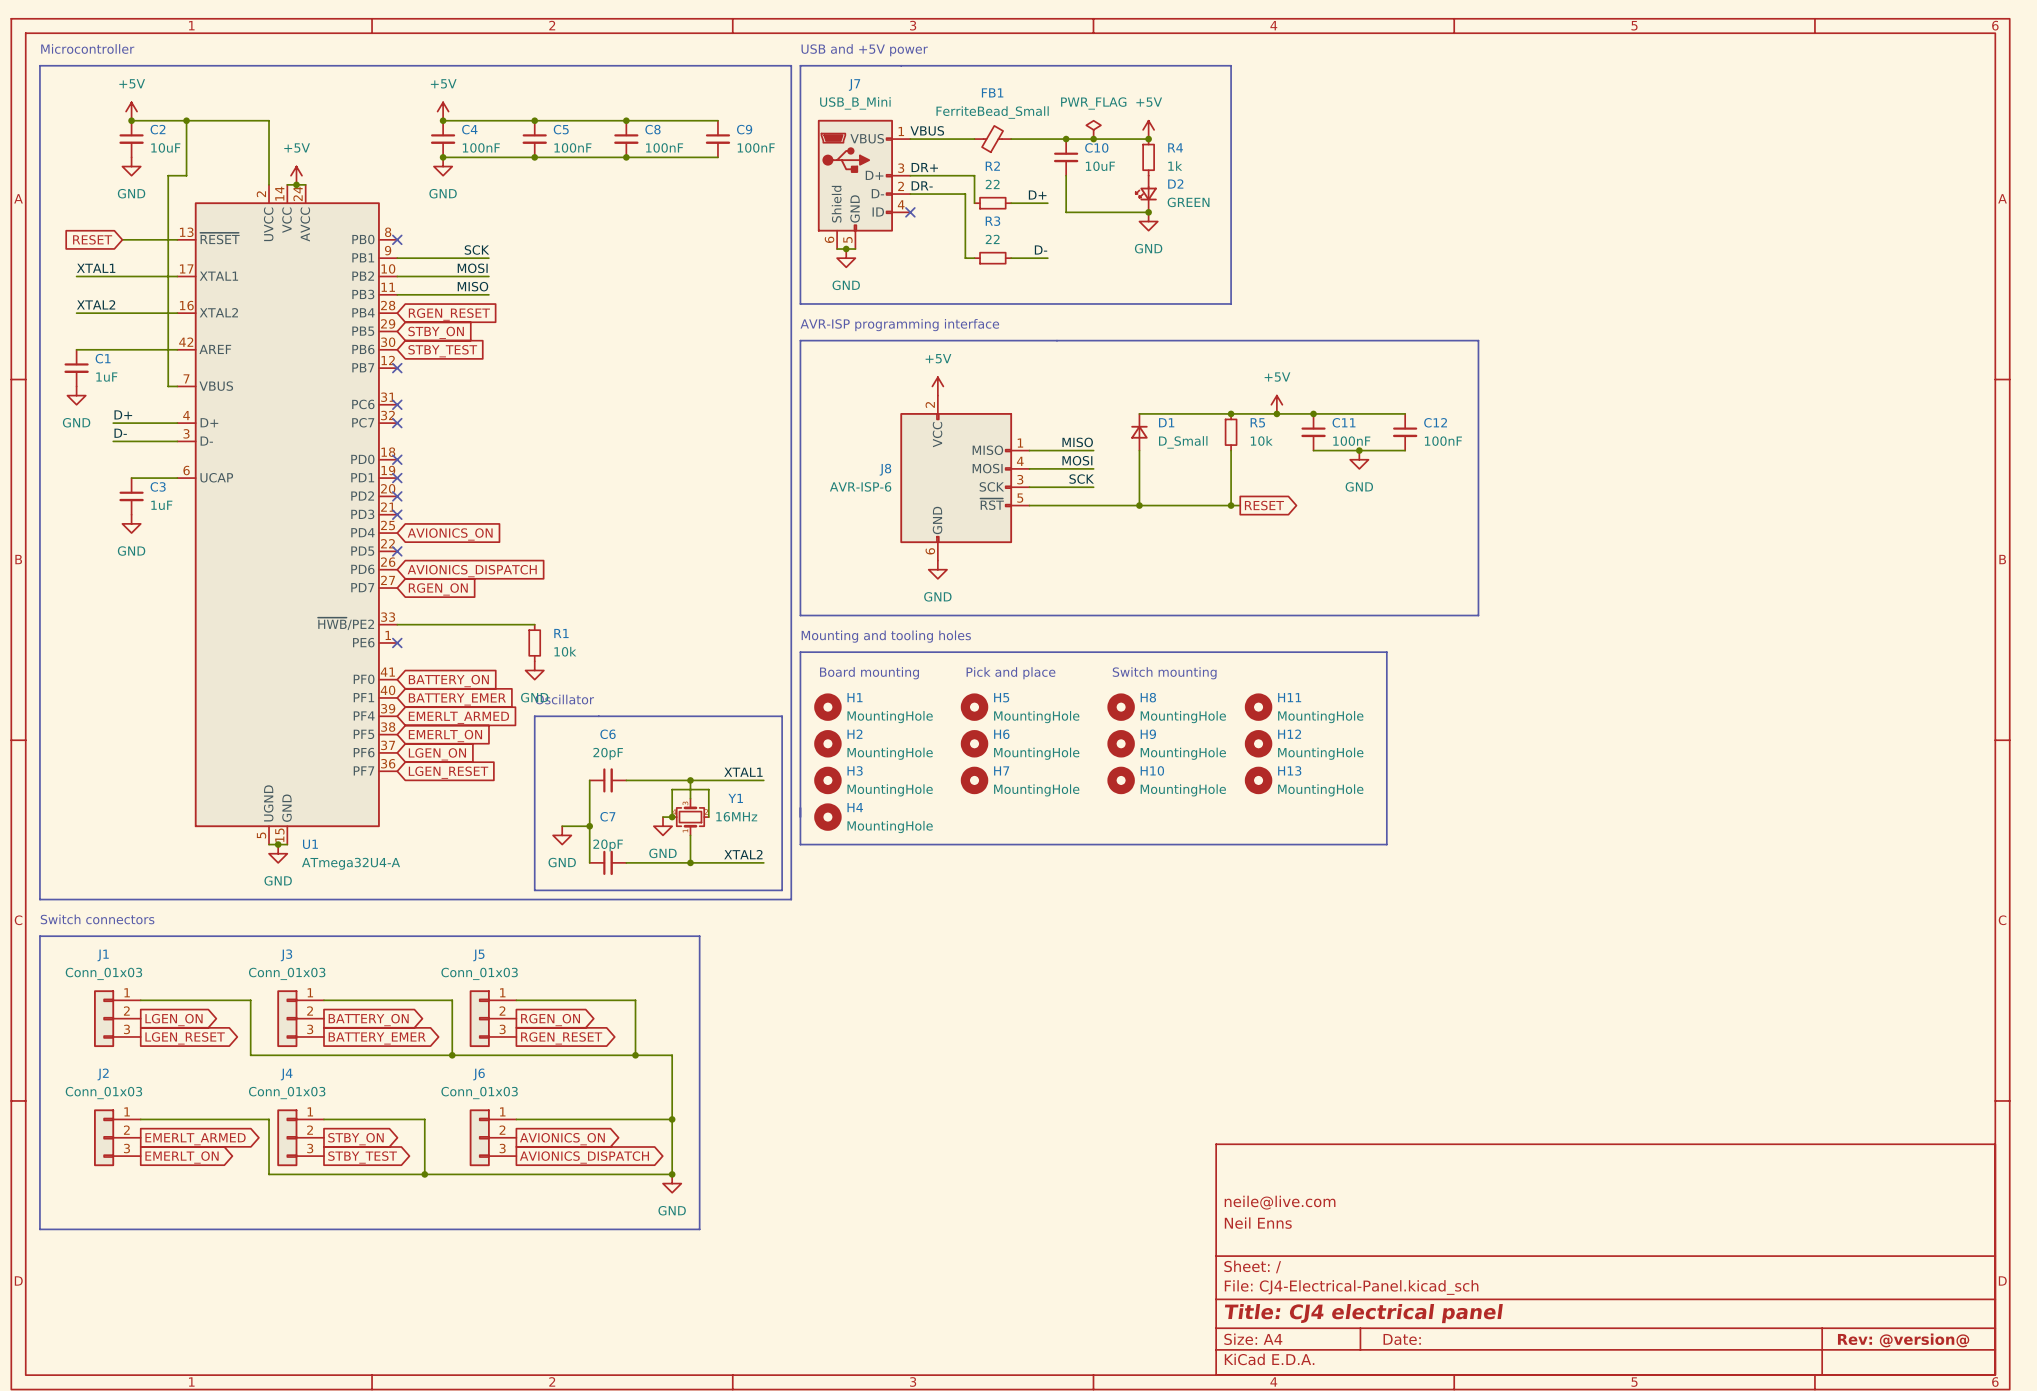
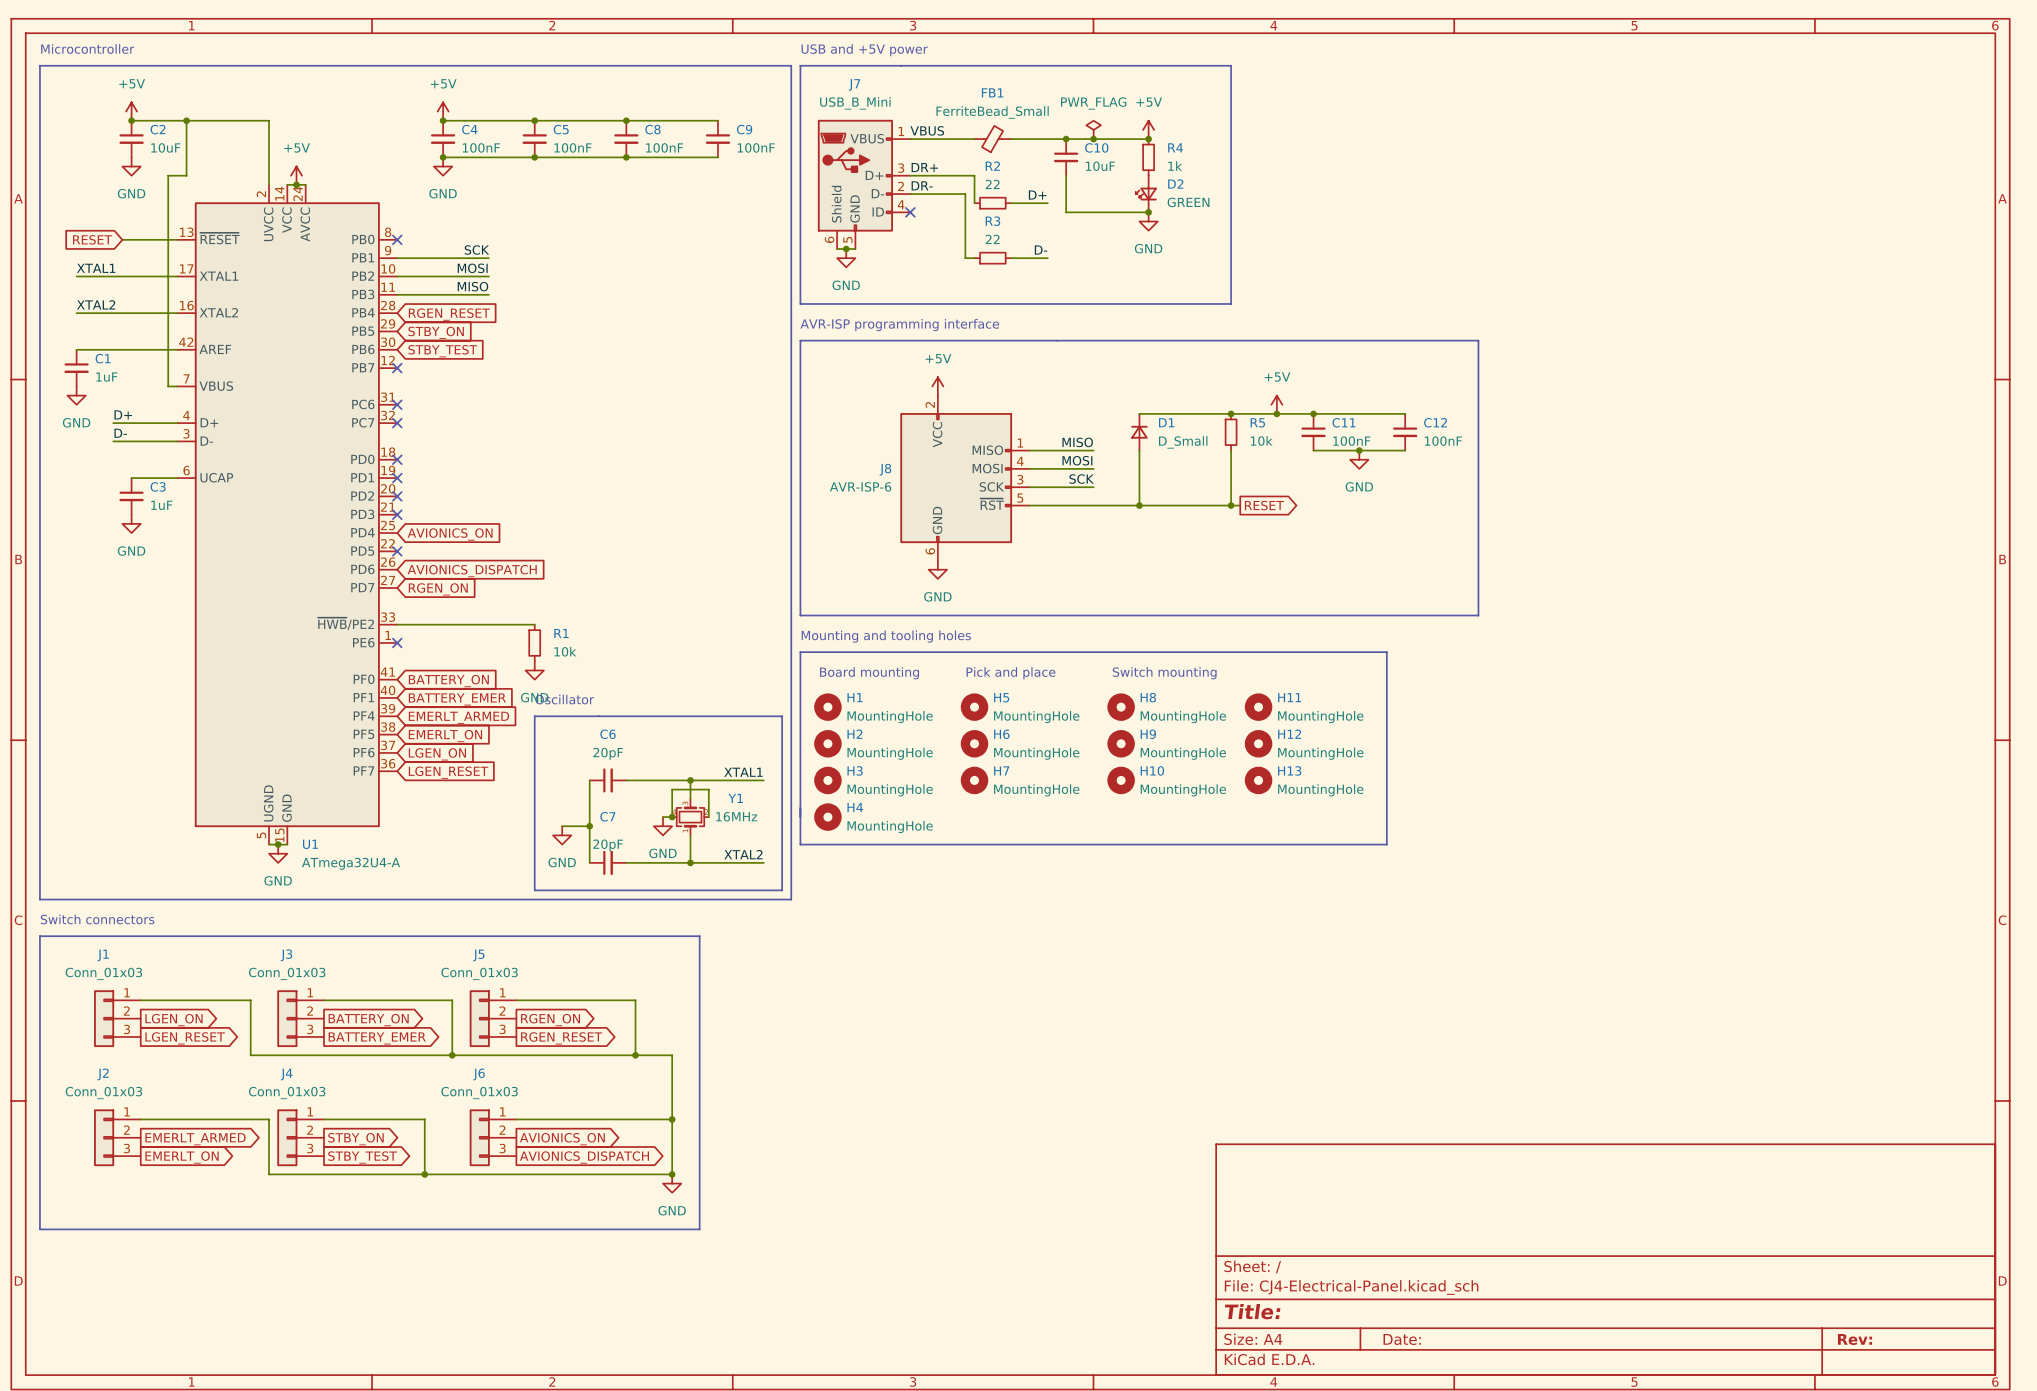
title block: neile@live.com (1280, 1202) -> none
title block: Neil Enns (1258, 1223) -> none
title block: Title: CJ4 electrical panel (1363, 1313) -> Title: (1252, 1311)
title block: Rev: @version@ (1903, 1340) -> Rev: (1855, 1339)

